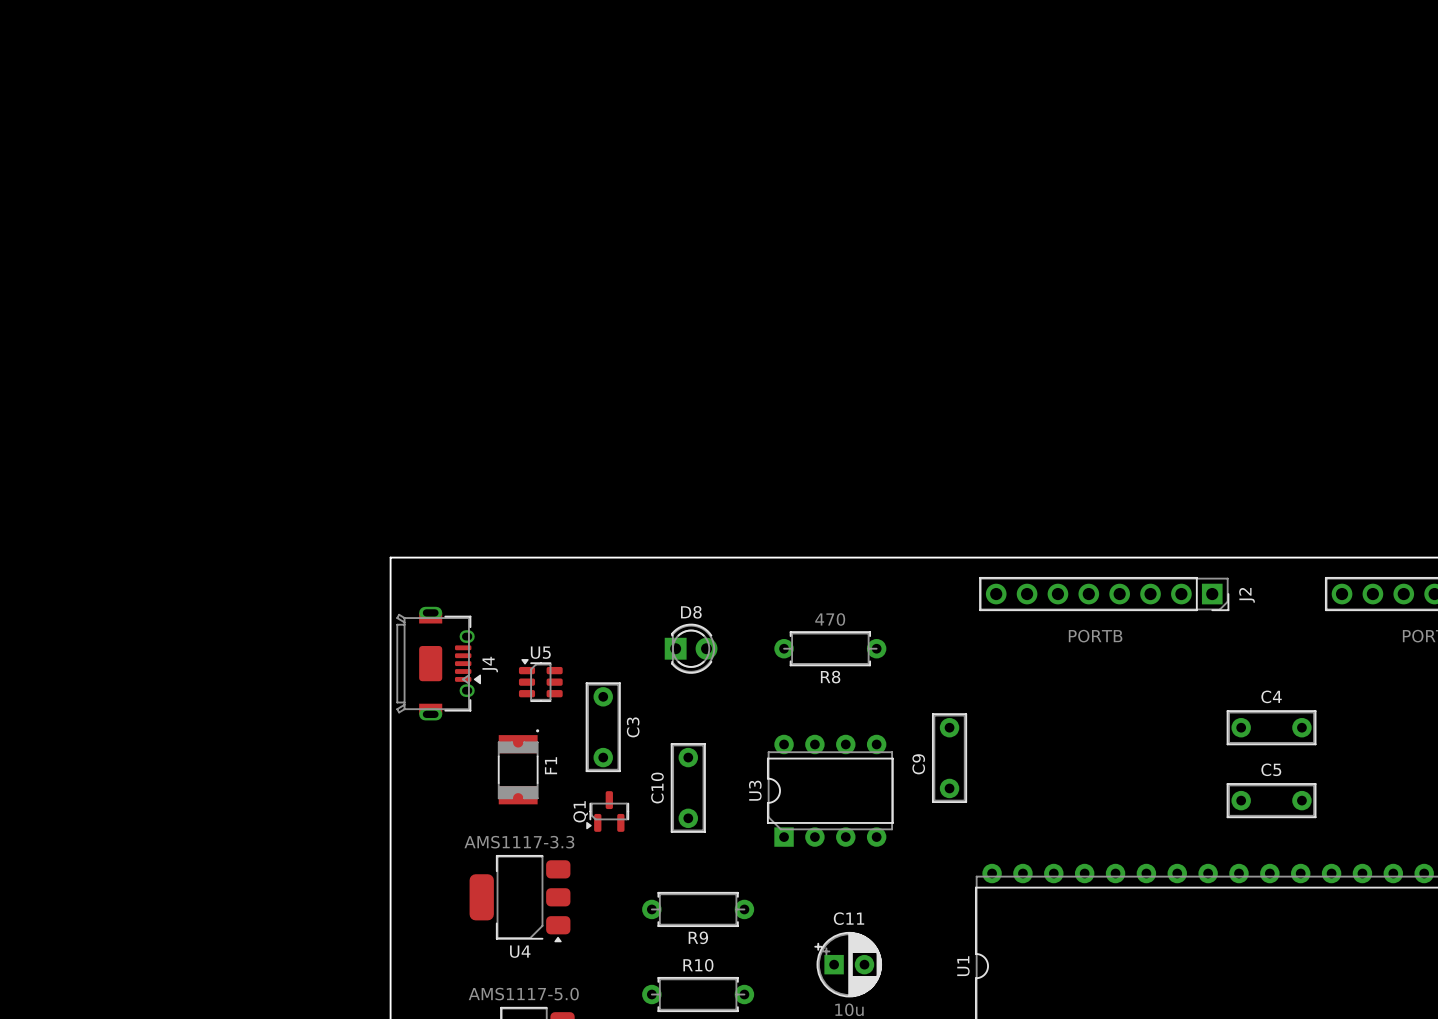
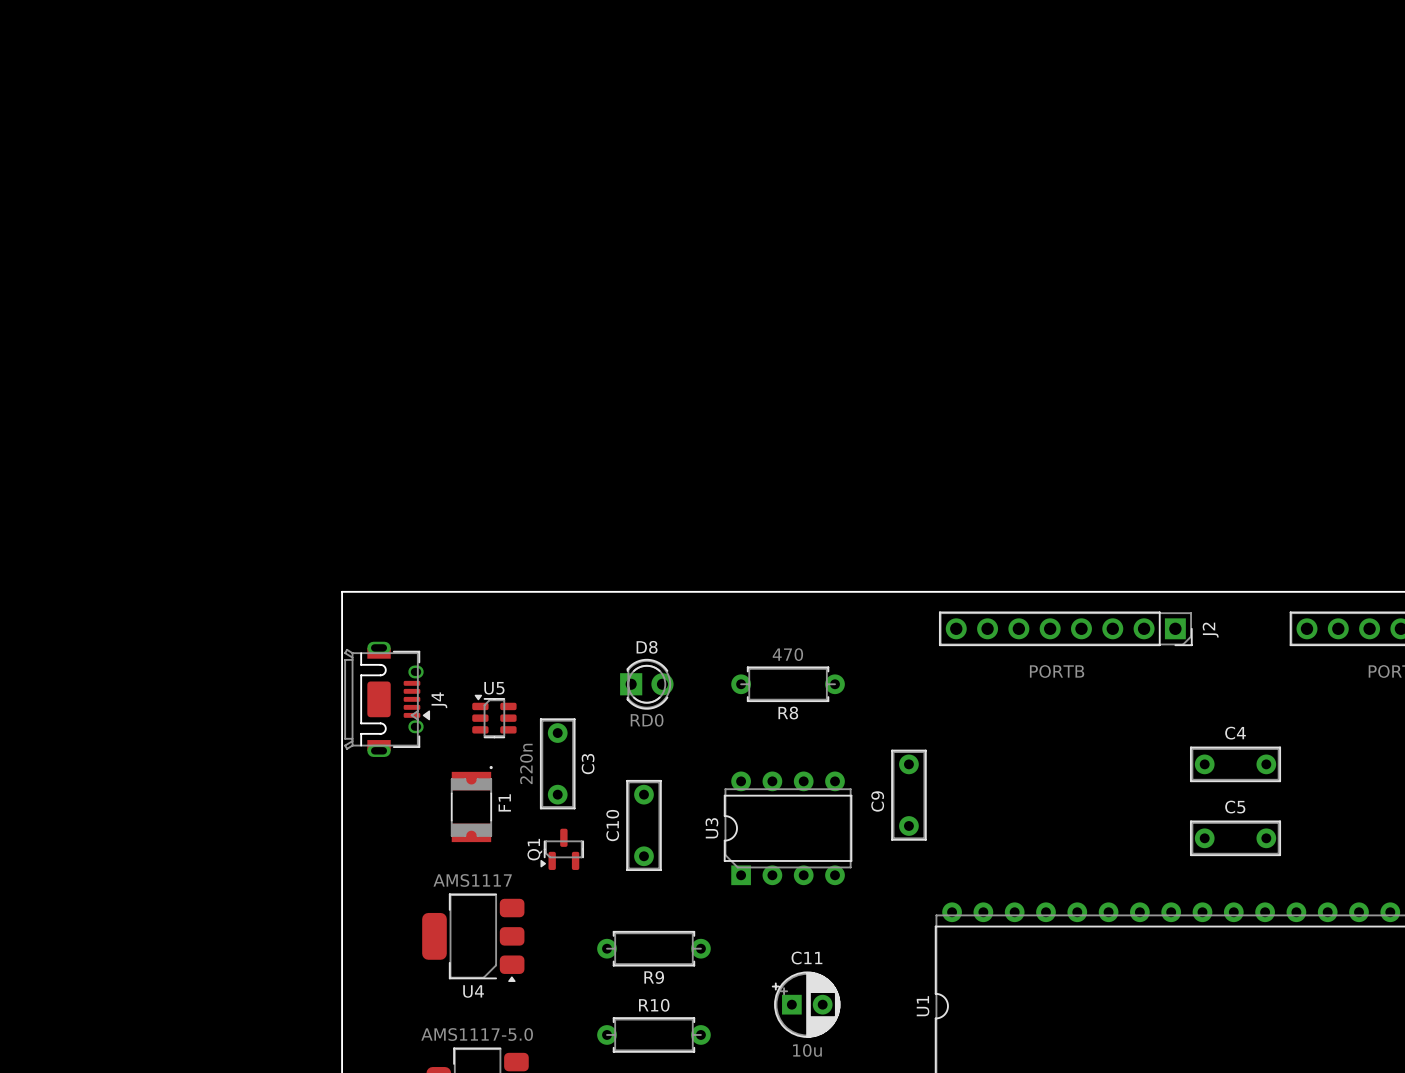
J4 footprint: [396, 606, 482, 721] -> [344, 641, 431, 757]
D8 value: none -> RD0 (647, 720)
C3 value: none -> 220n (526, 763)
U4 value: AMS1117-3.3 (519, 842) -> AMS1117 (472, 880)

